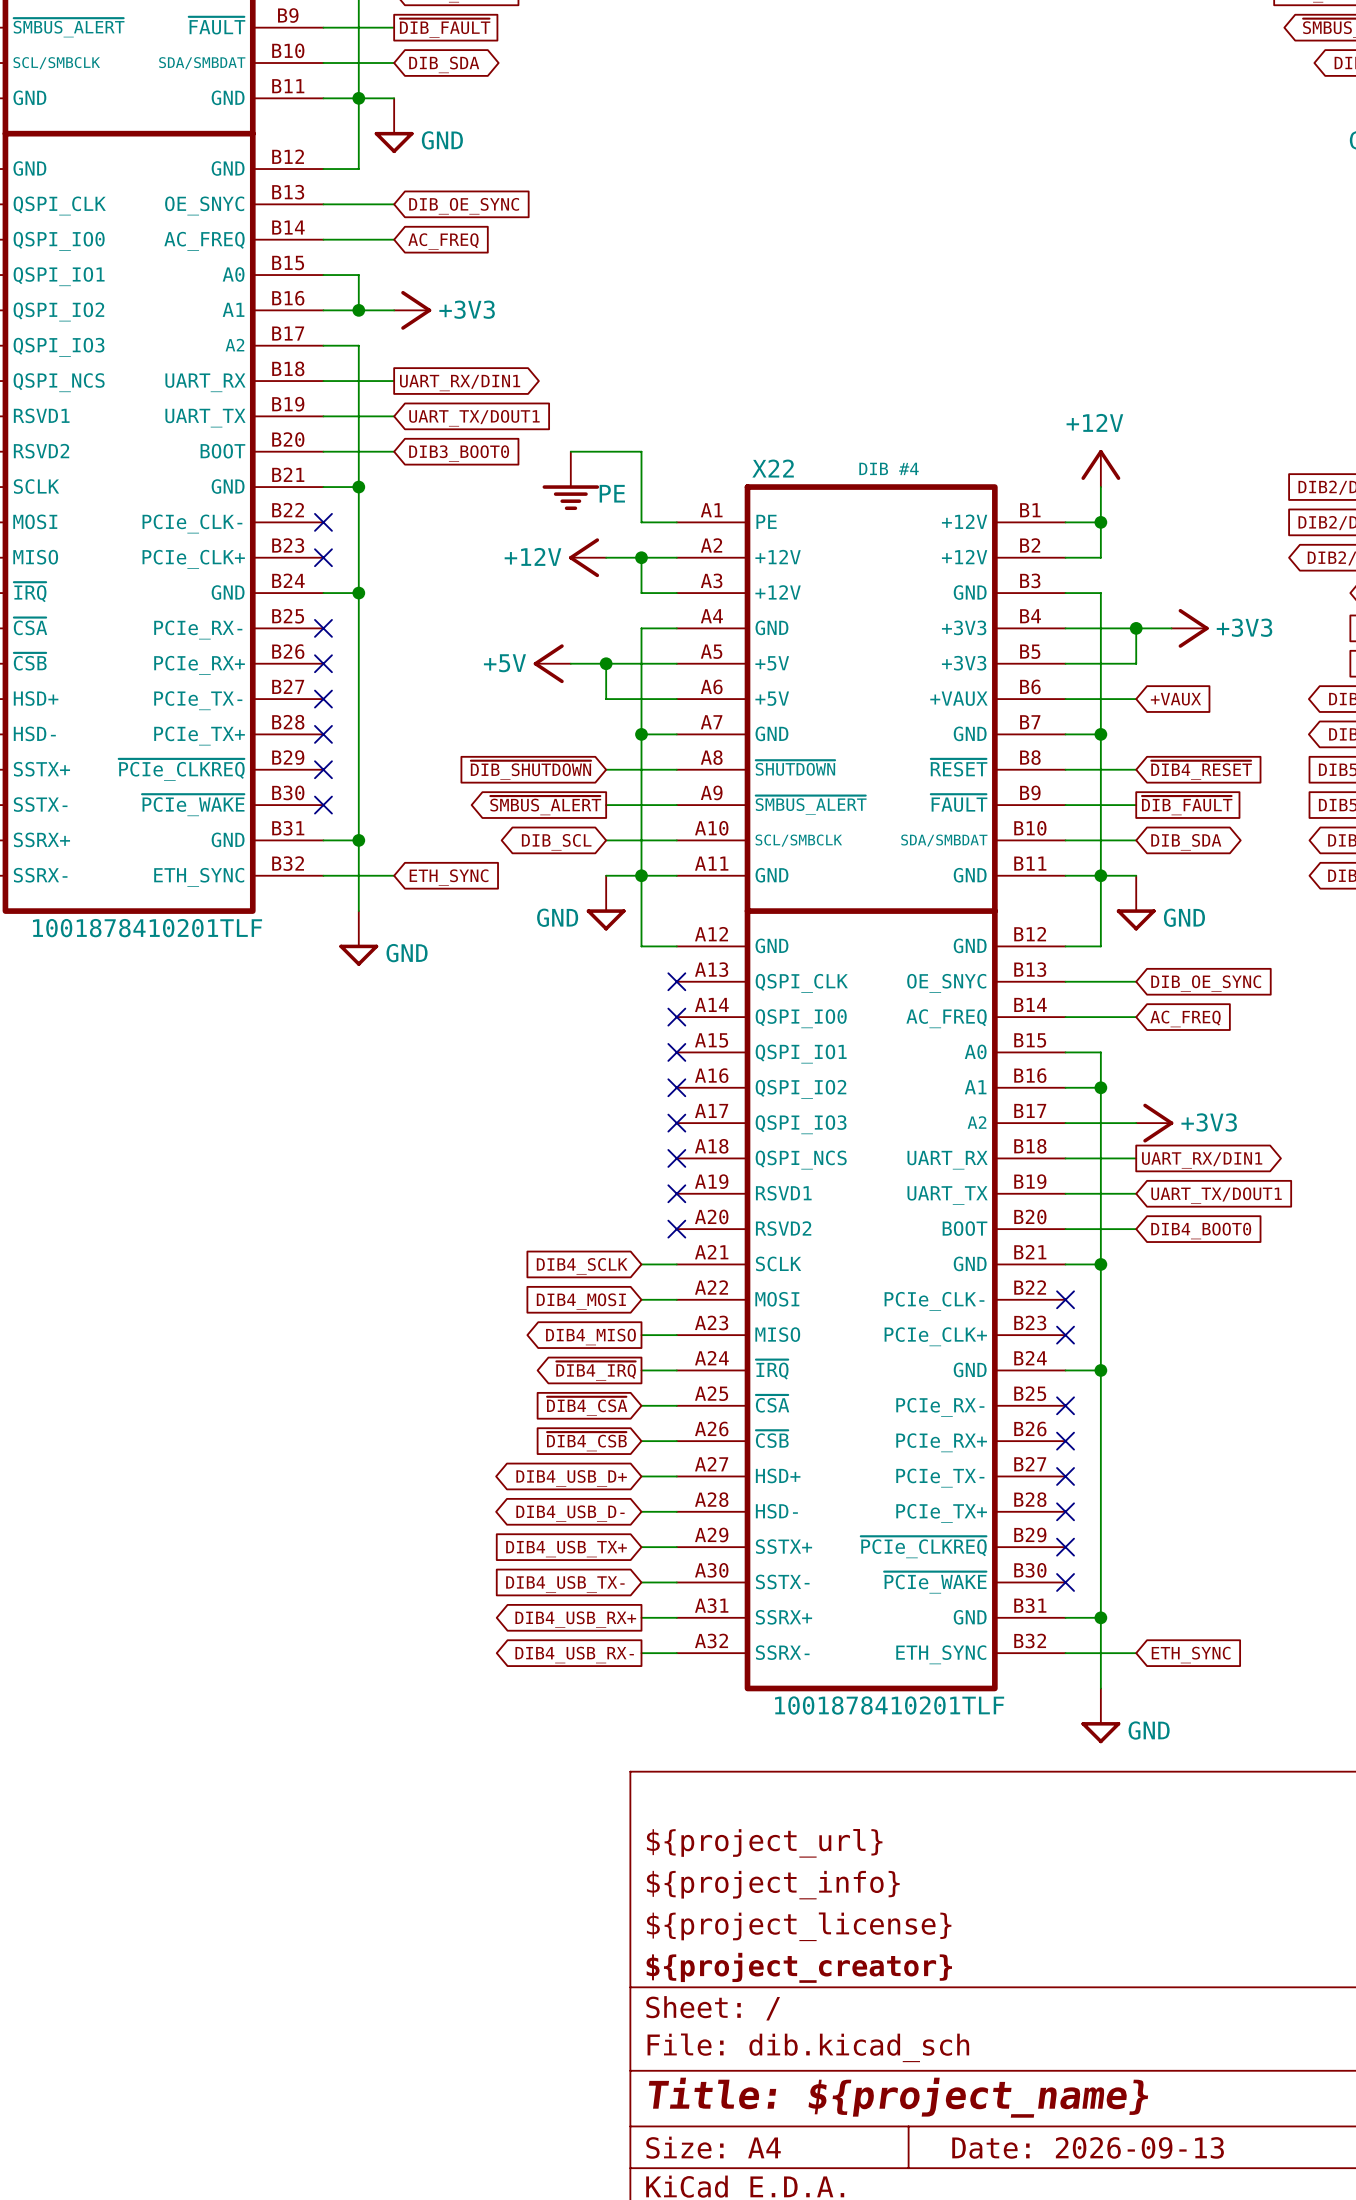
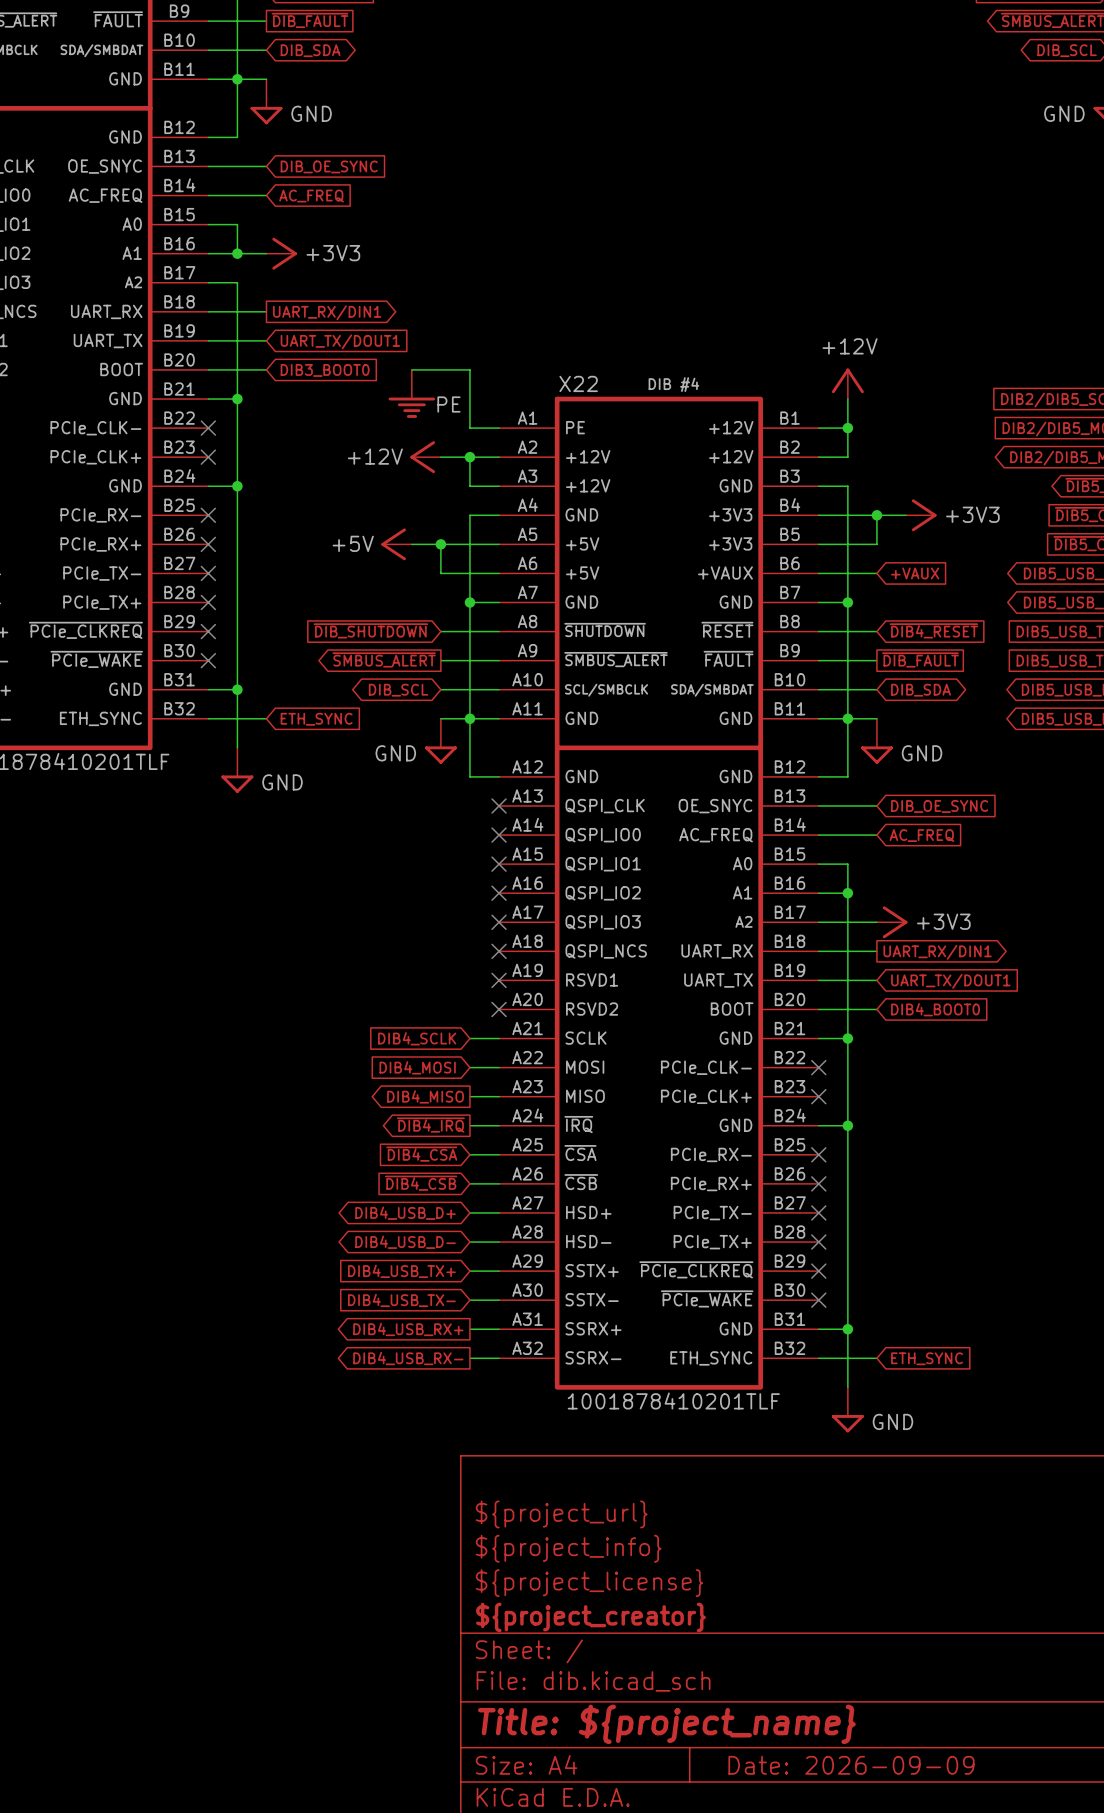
title block: Date: 2026-09-13 (1088, 2147) -> Date: 2026-09-09 (851, 1765)

